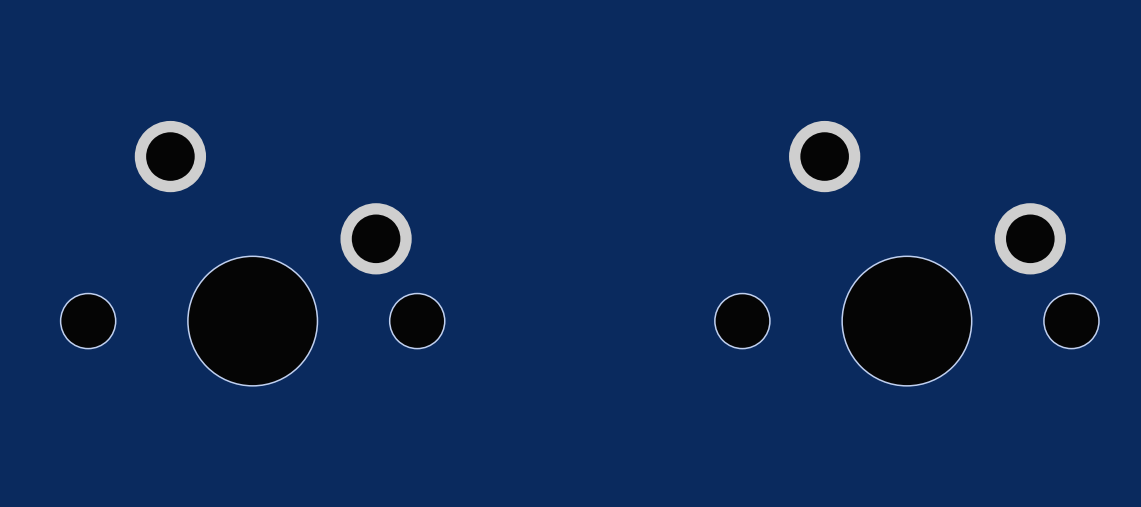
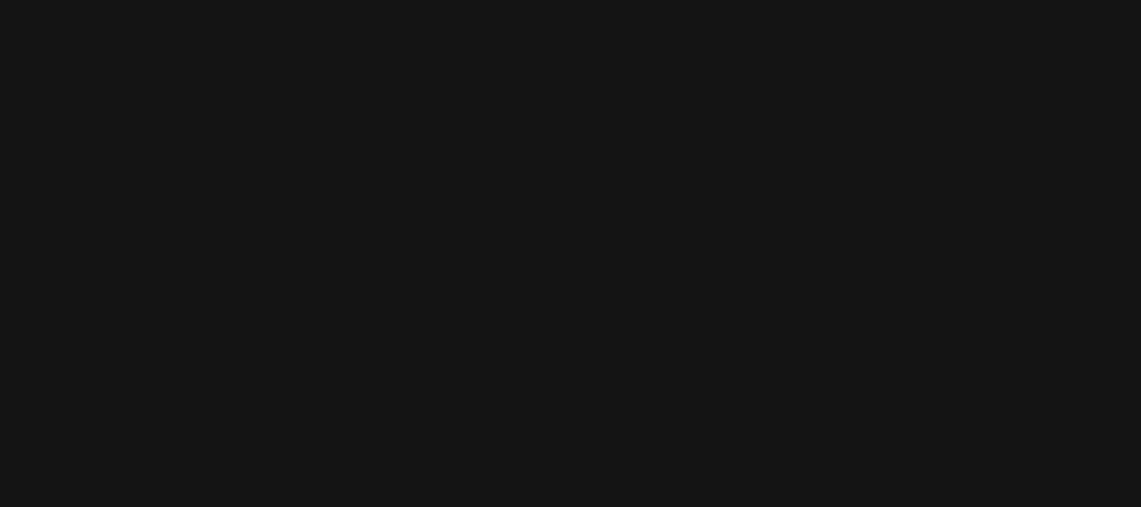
part: (252, 253) -> none
part: (906, 253) -> none

